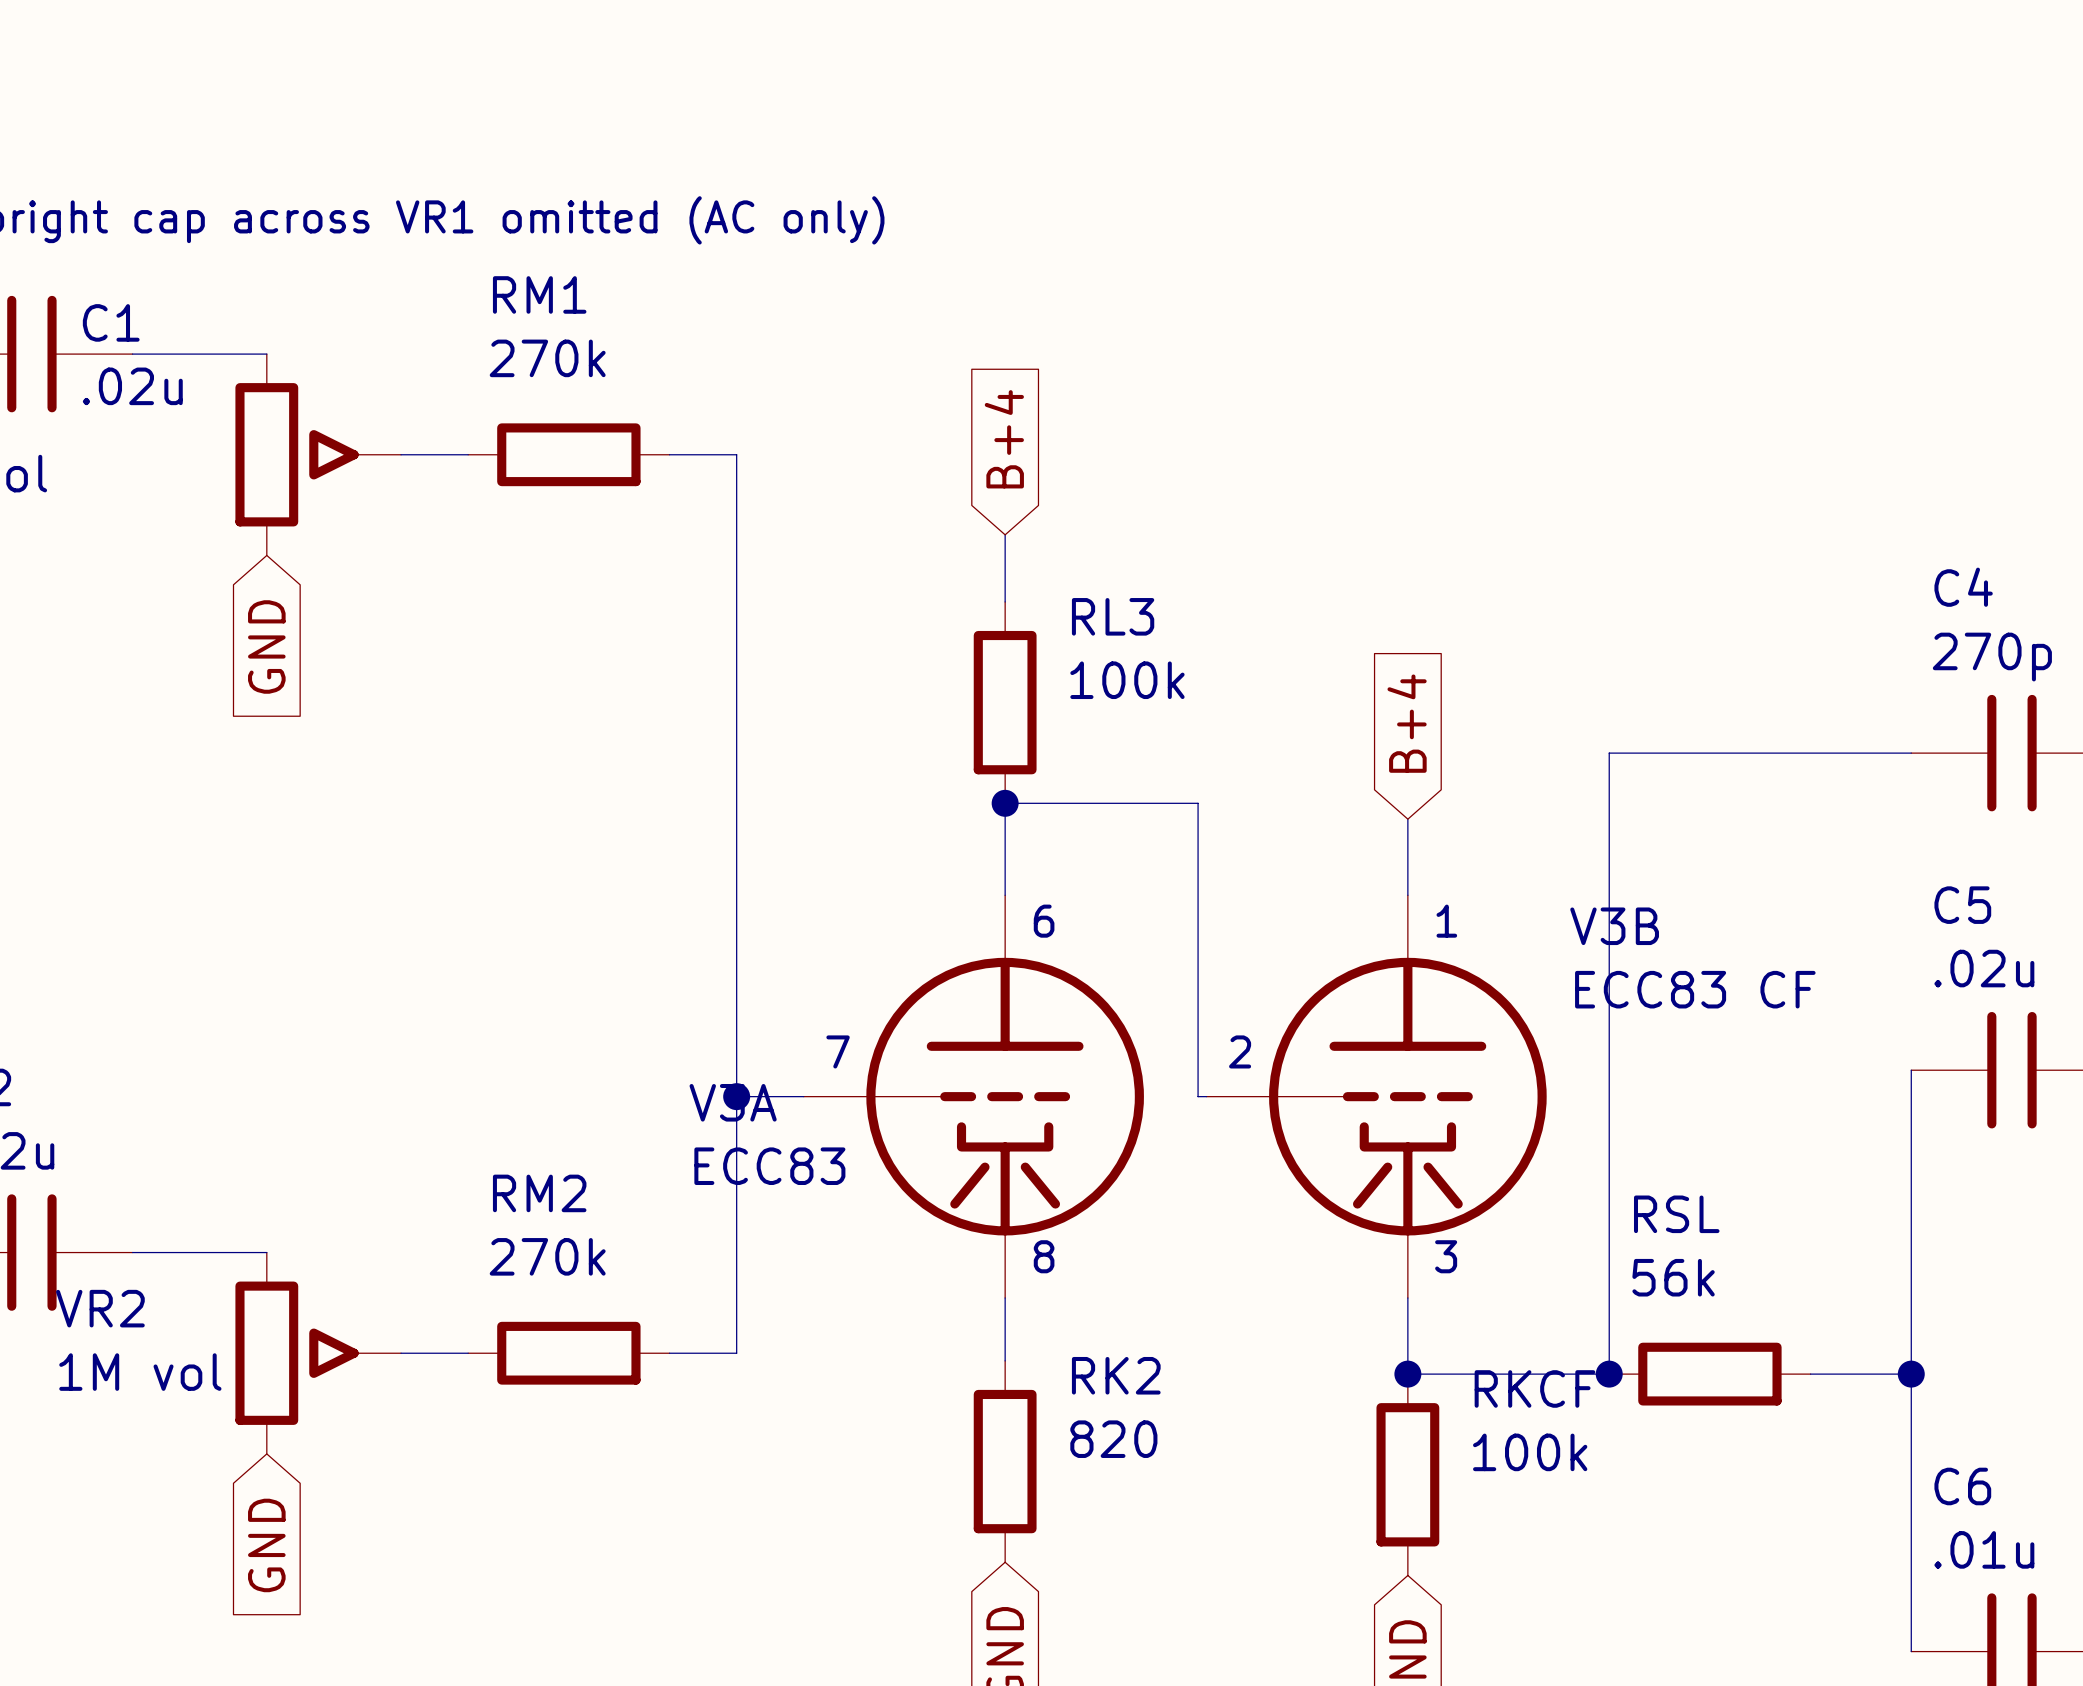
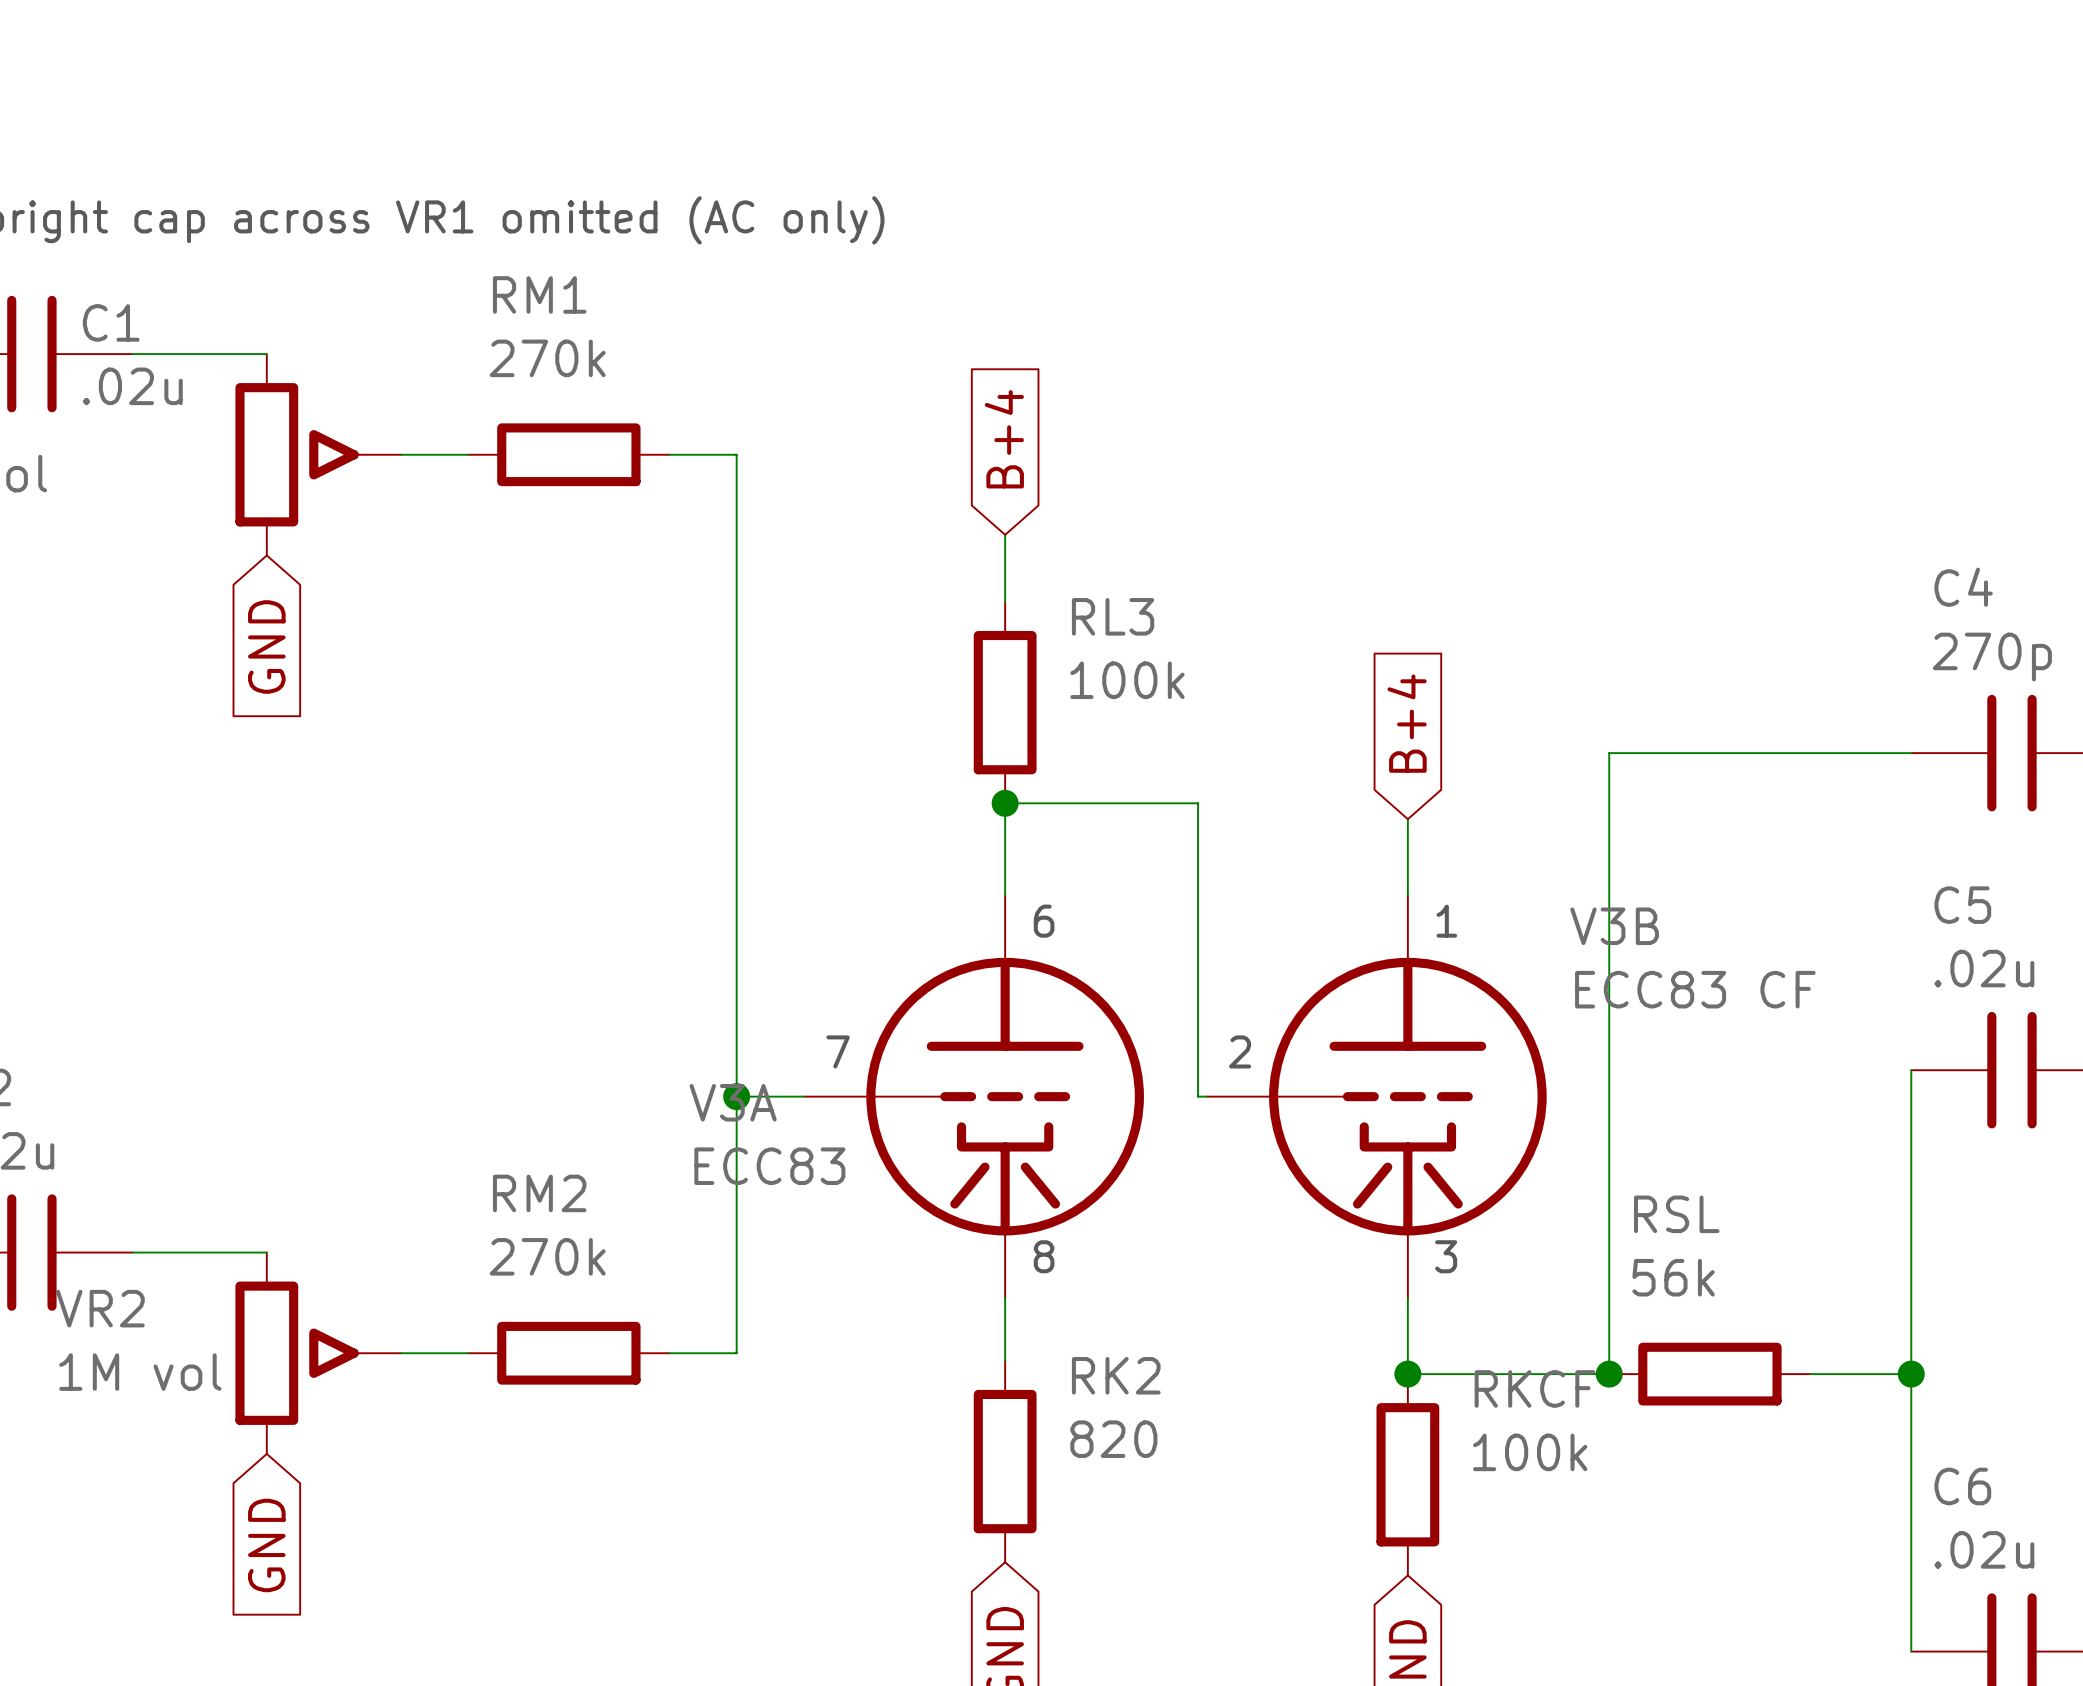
C6 value: .01u (1984, 1549) -> .02u (1984, 1549)

